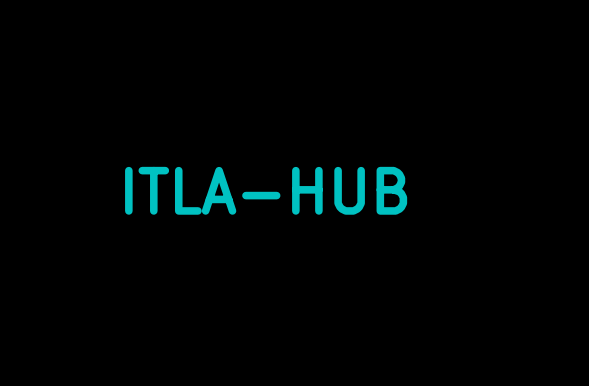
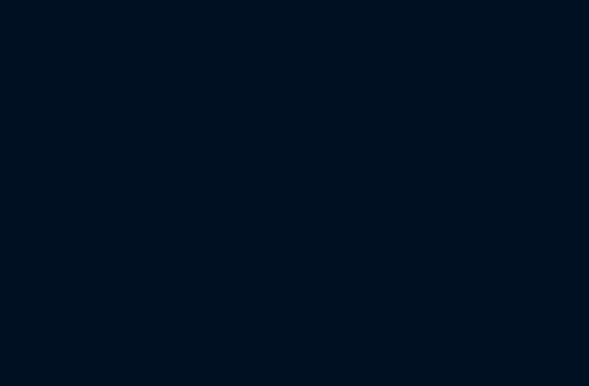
text: ITLA-HUB (266, 190) -> none

